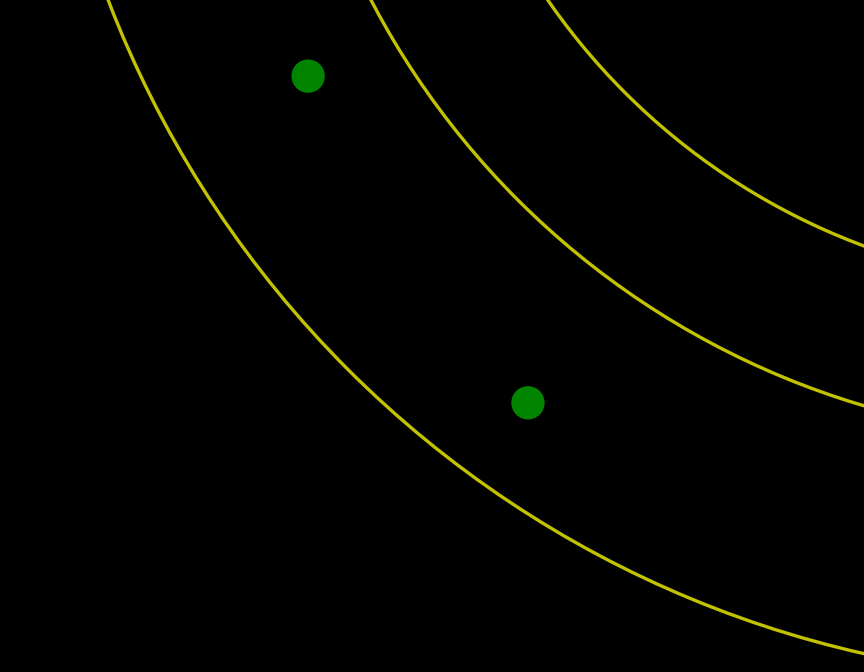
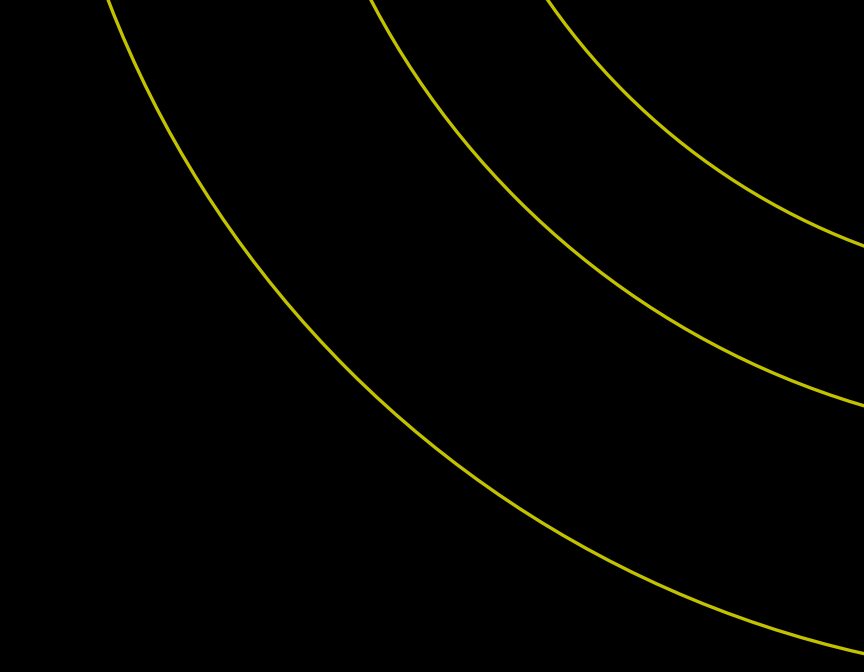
part: (308, 76) -> none
part: (527, 402) -> none

